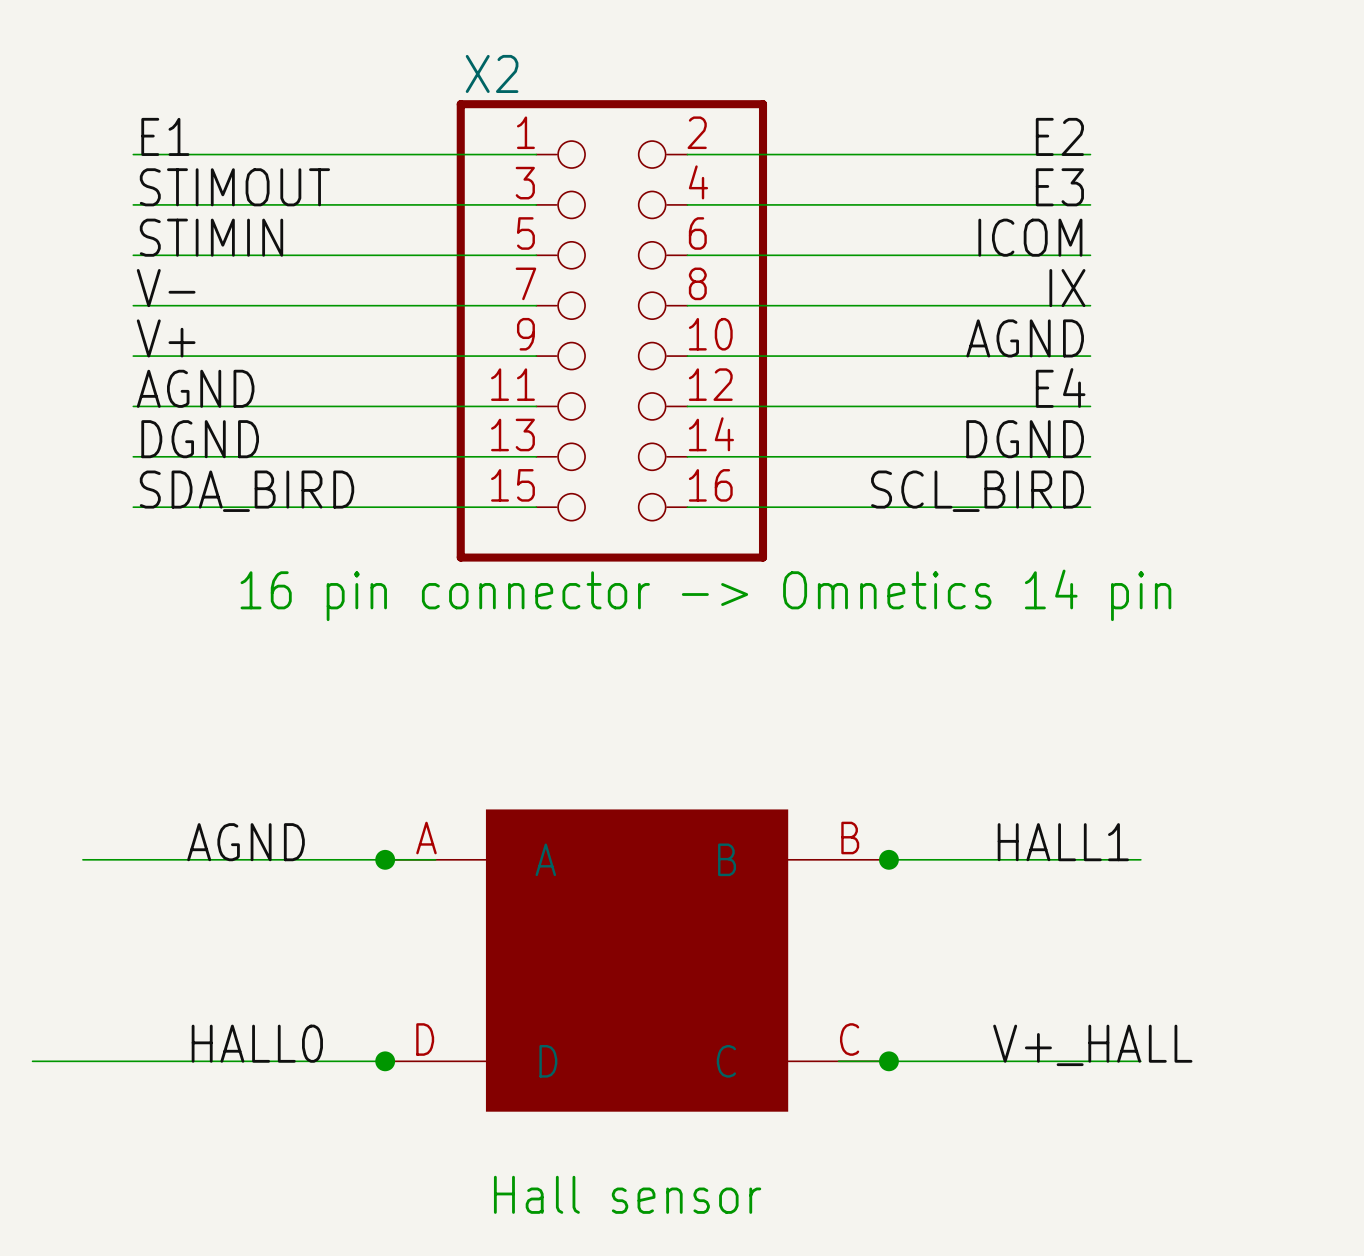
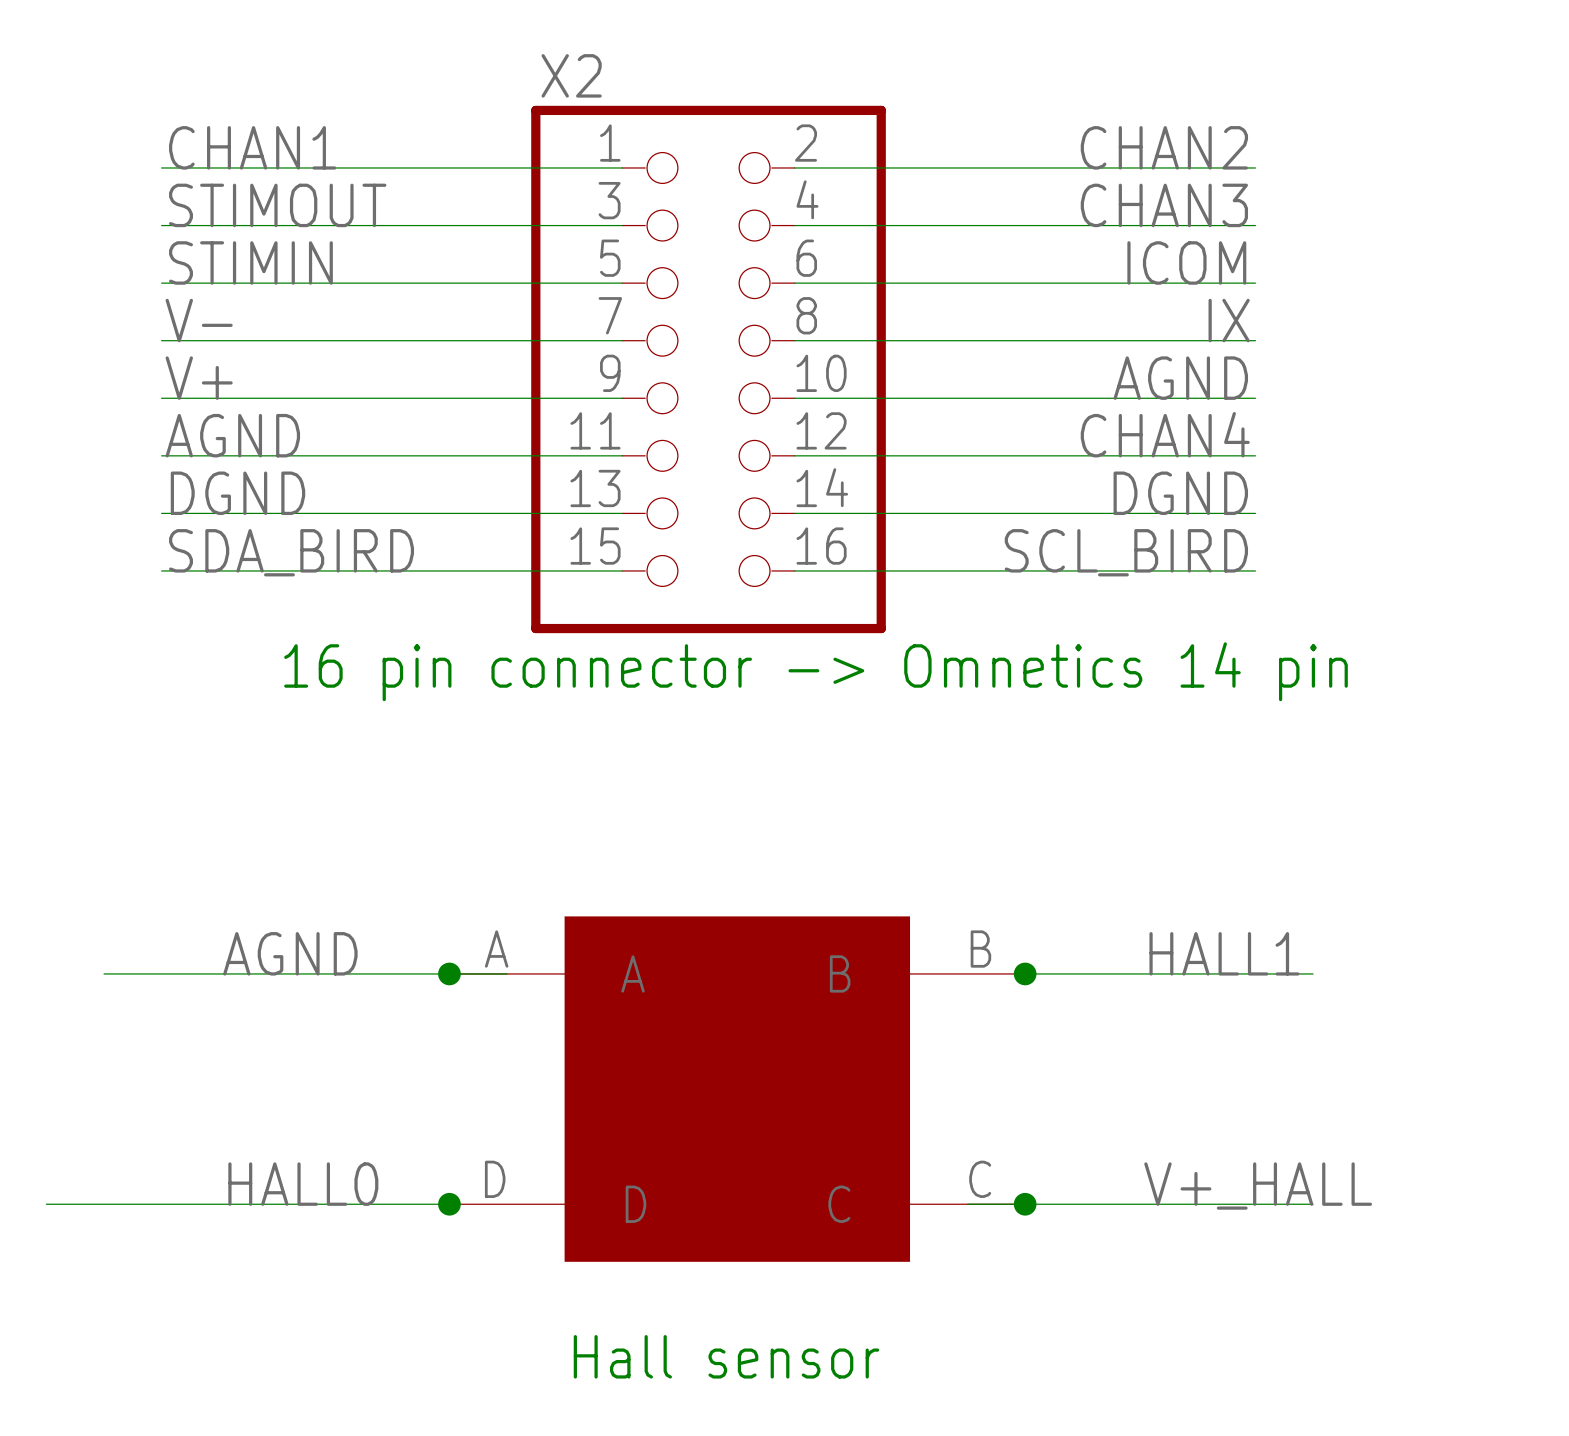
label: E1 (165, 136) -> CHAN1 (252, 147)
label: E2 (1059, 136) -> CHAN2 (1164, 147)
label: E3 (1059, 187) -> CHAN3 (1164, 205)
label: E4 (1060, 387) -> CHAN4 (1165, 434)

